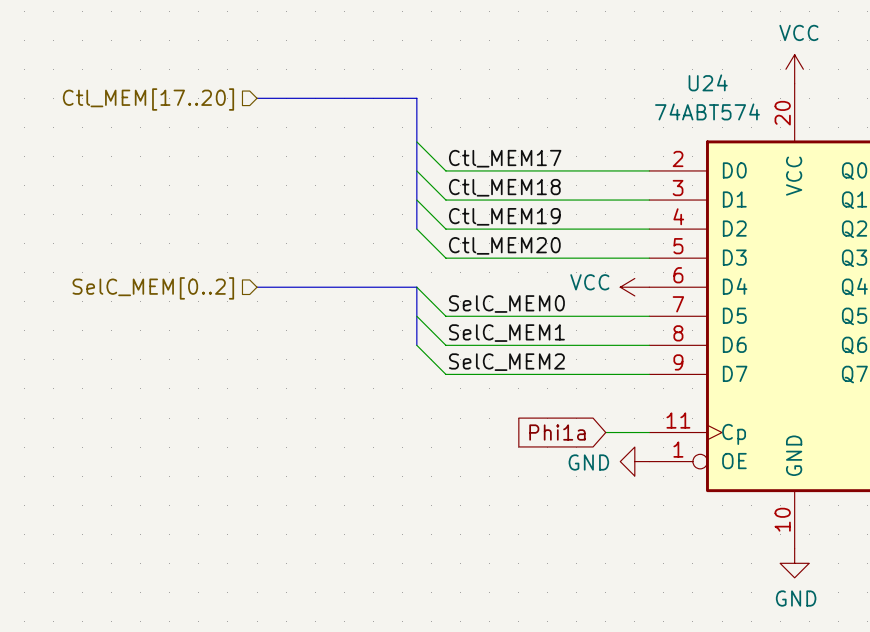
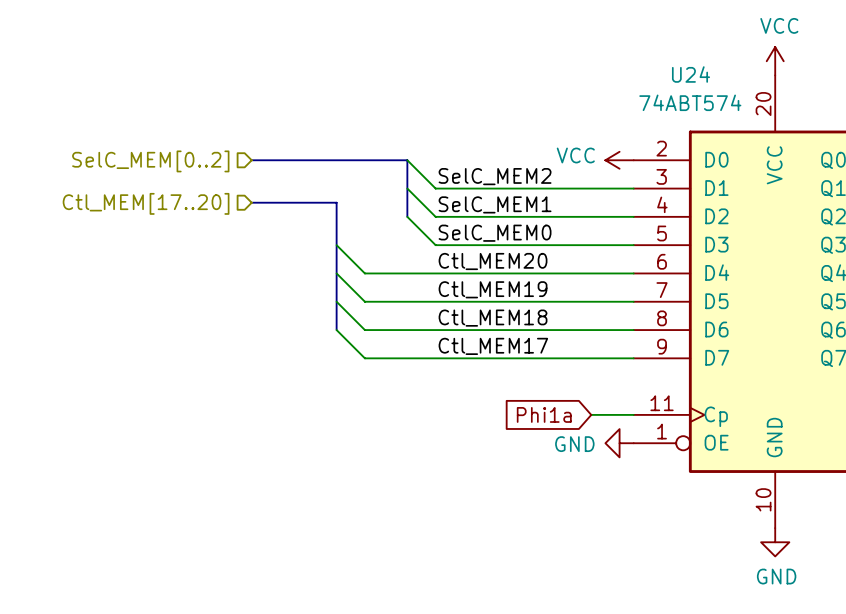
bus: (257, 98) (416, 98) (416, 170) -> (251, 160) (407, 160)
hierarchical label position: Ctl_MEM[17..20] (148, 99) -> Ctl_MEM[17..20] (146, 203)
wire: (416, 141) (445, 170) (649, 170) -> none
label: Ctl_MEM17 (505, 158) -> none
label: Ctl_MEM18 (504, 187) -> SelC_MEM2 (495, 176)
bus: none -> (251, 202) (336, 202) (336, 330)
label: Ctl_MEM19 (504, 216) -> SelC_MEM1 (495, 204)
label: Ctl_MEM20 (504, 245) -> SelC_MEM0 (495, 233)
wire: none -> (336, 245) (364, 273) (633, 273)
label: none -> Ctl_MEM20 (493, 261)
bus: (257, 287) (416, 287) (416, 345) -> none
wire: (416, 287) (445, 316) -> (336, 273) (364, 301) (435, 301)
power symbol position: VCC (634, 287) -> VCC (619, 160)
hierarchical label position: SelC_MEM[0..2] (153, 288) -> SelC_MEM[0..2] (150, 161)
label: SelC_MEM0 (506, 304) -> Ctl_MEM19 (493, 289)
wire: (416, 316) (445, 345) -> (336, 301) (364, 330) (435, 330)
label: SelC_MEM1 (506, 333) -> Ctl_MEM18 (493, 318)
wire: (416, 345) (445, 374) -> (336, 330) (364, 358) (435, 358)
label: SelC_MEM2 (506, 362) -> Ctl_MEM17 (493, 346)

